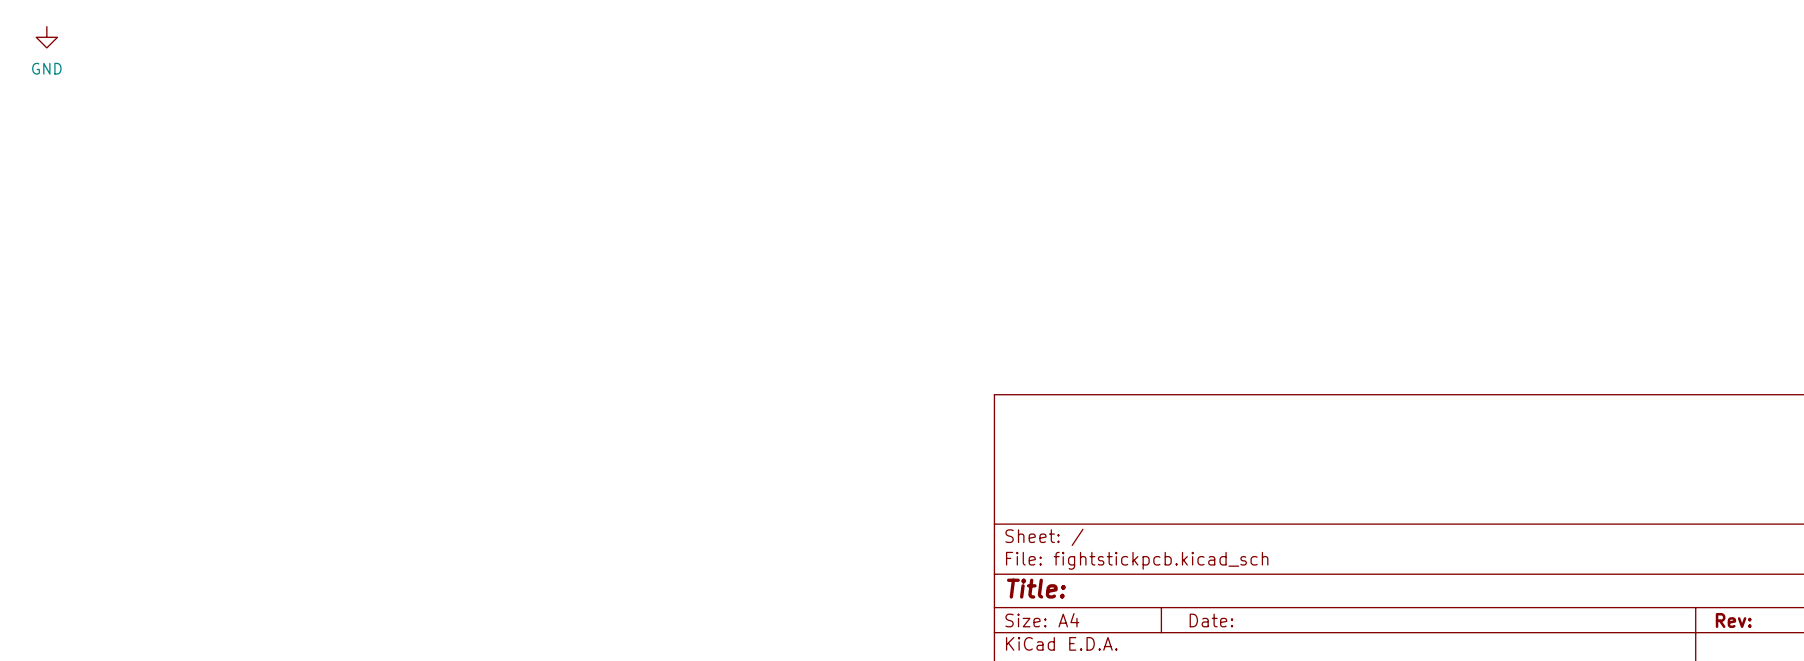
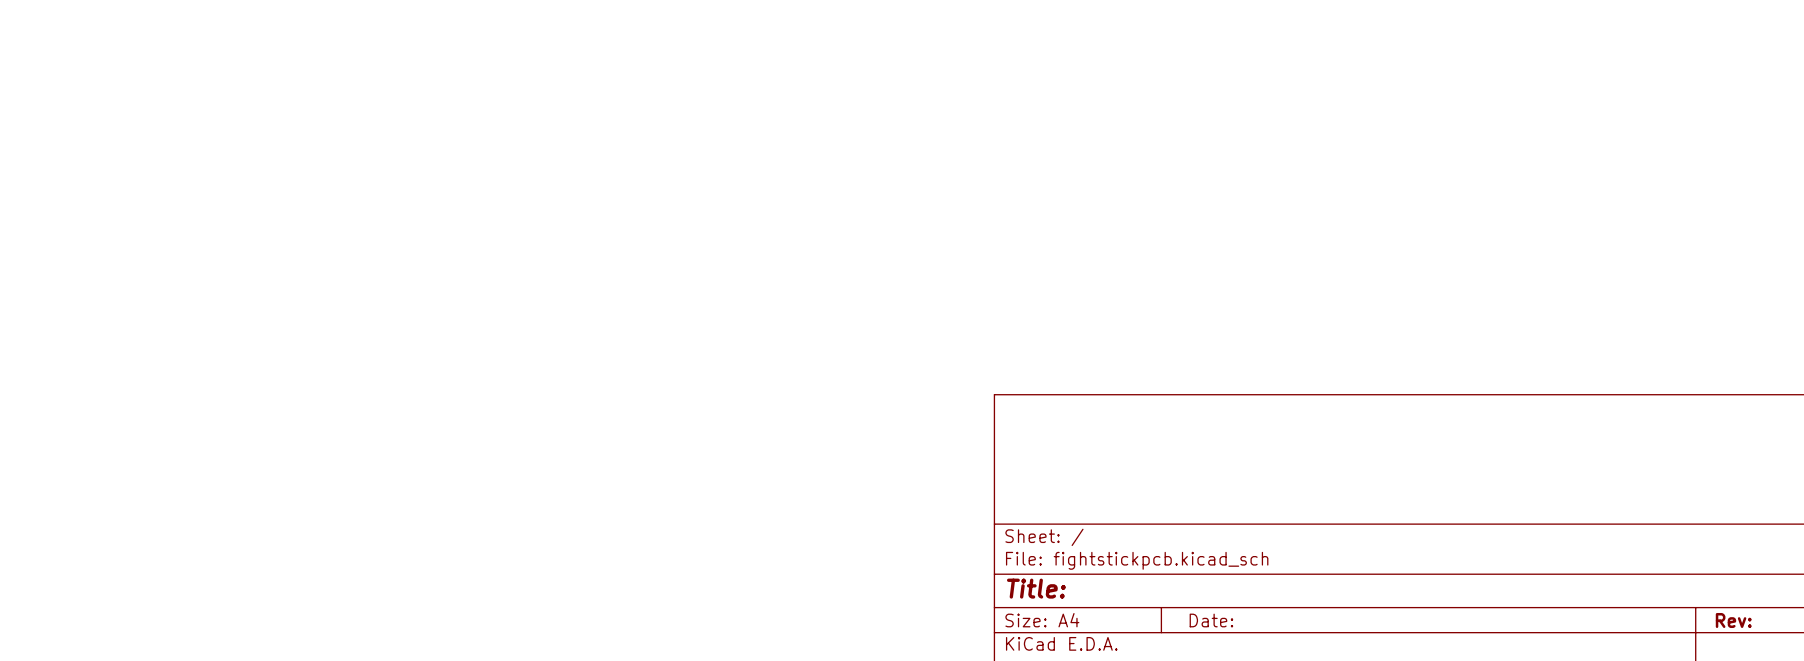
power symbol: GND (46, 37) -> none

